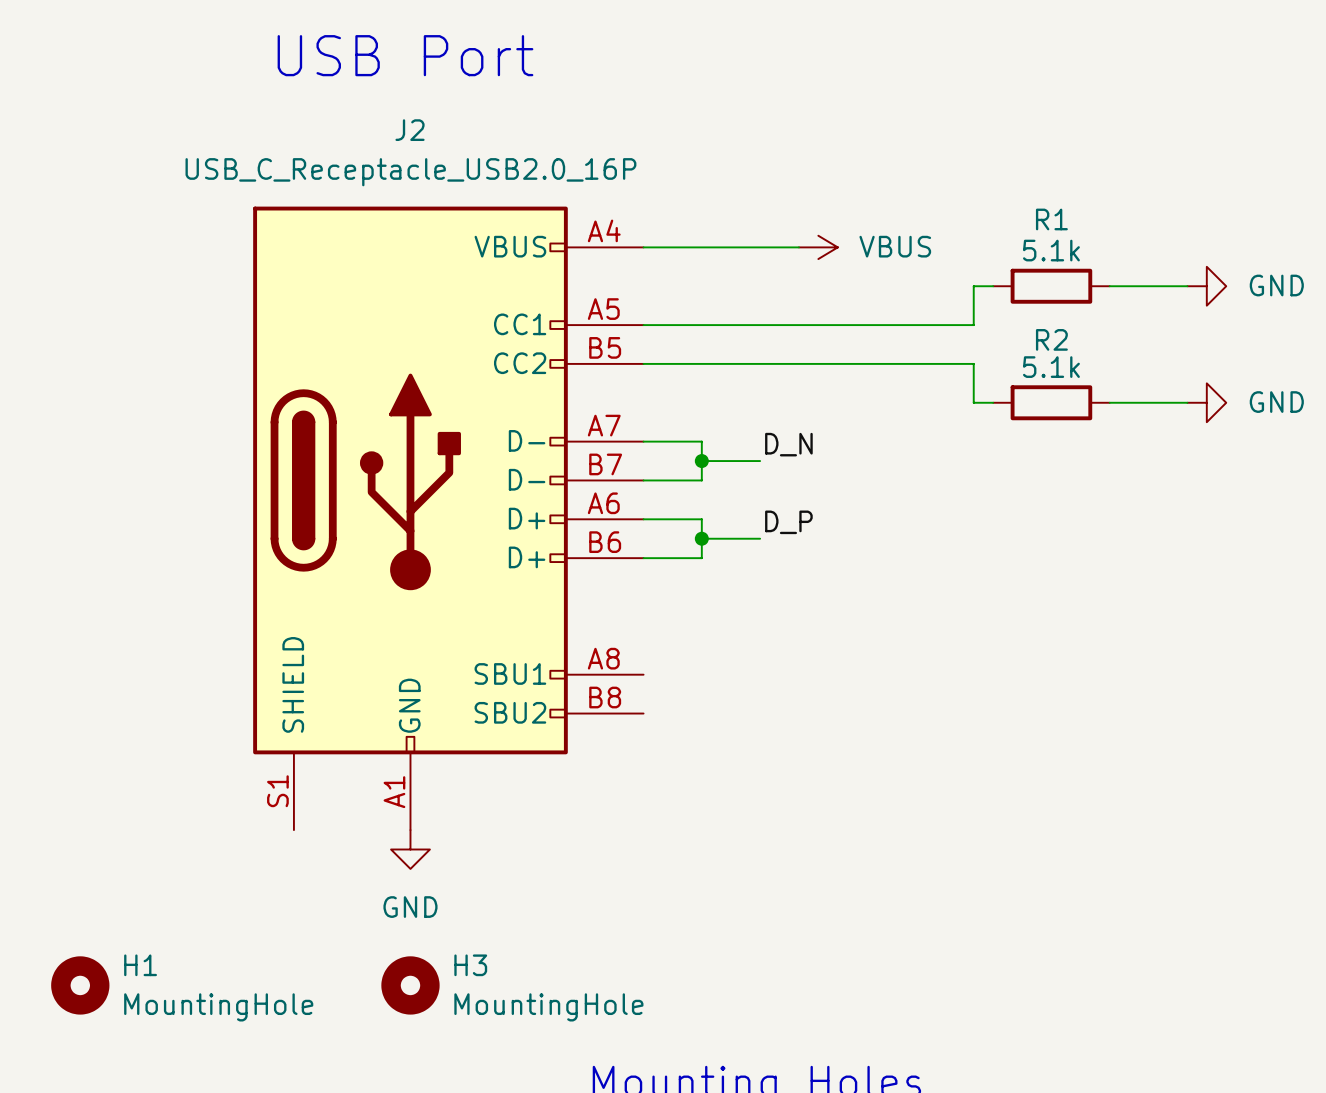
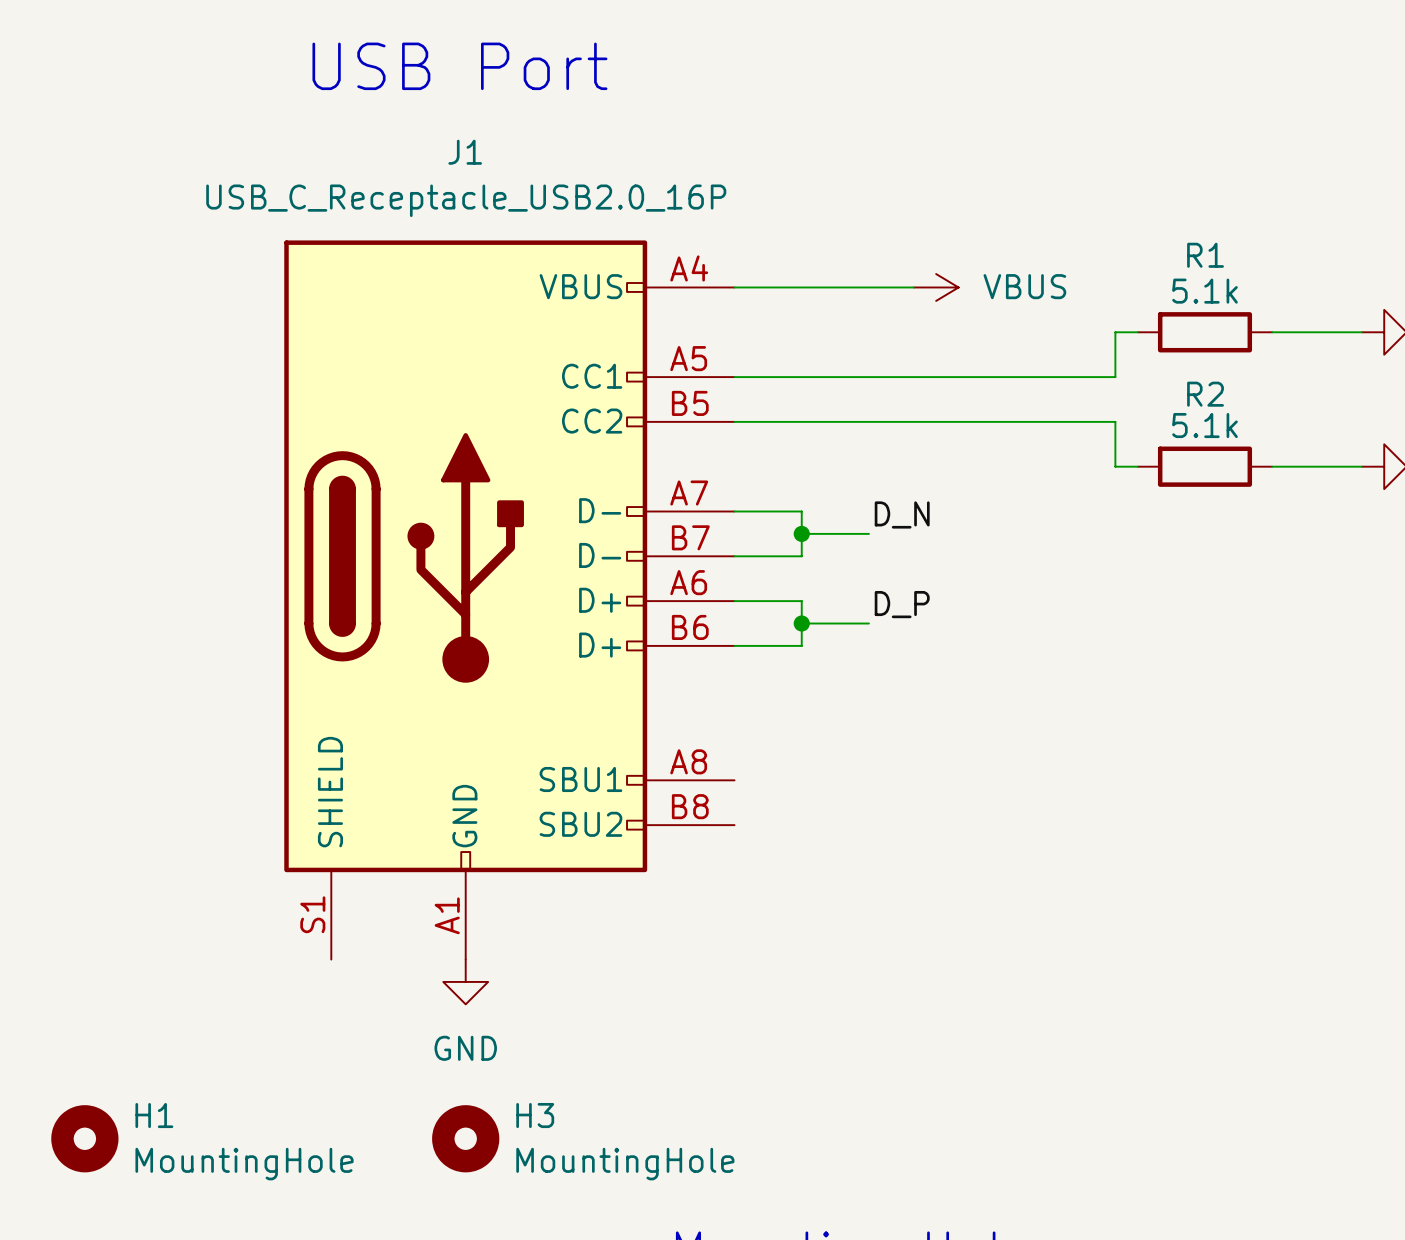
J2 name: J2 (410, 130) -> J1 (465, 152)

